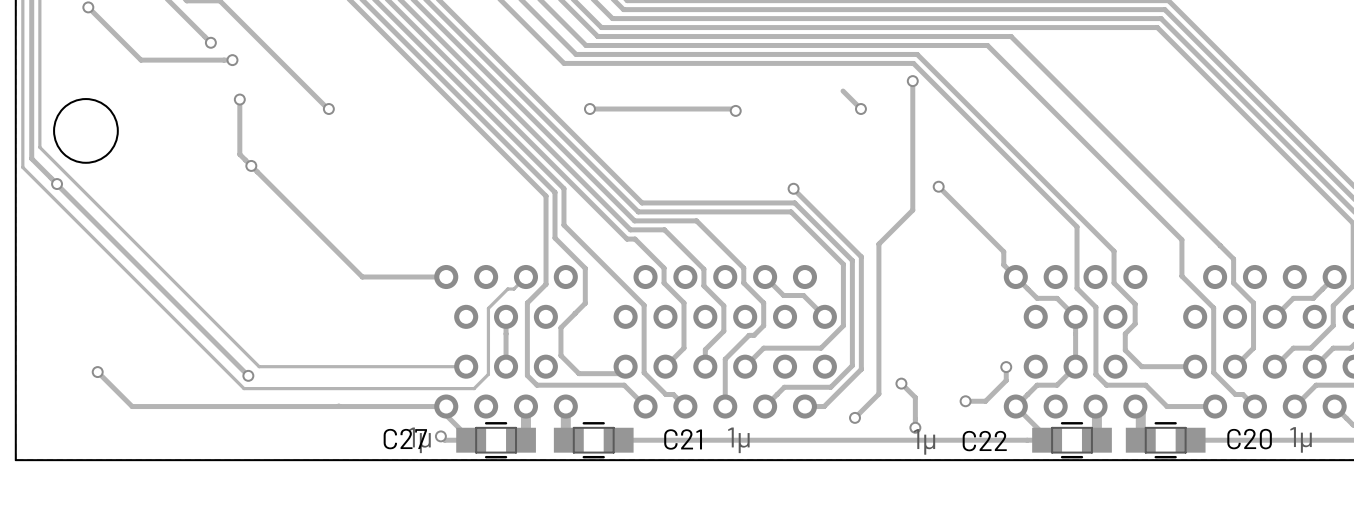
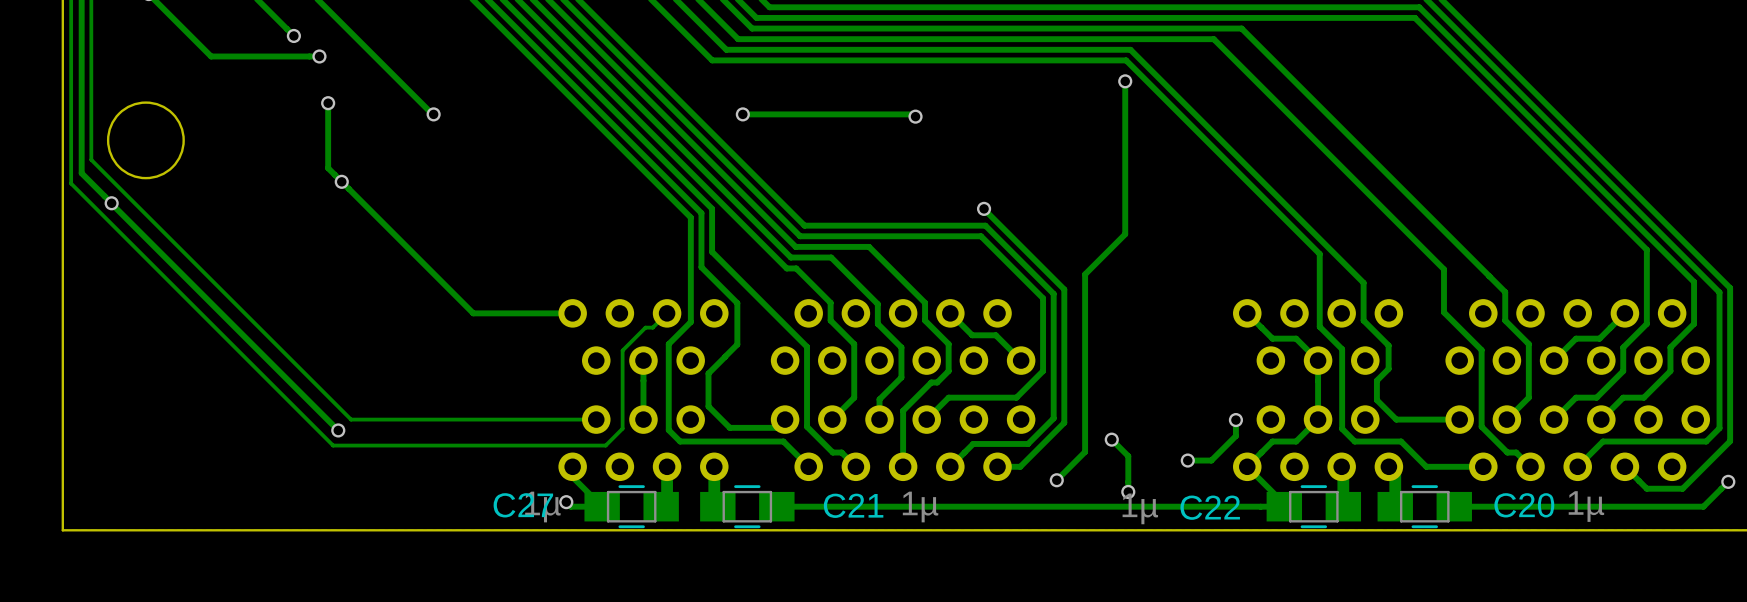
track: (843, 91) (860, 109) -> none
via: (860, 109) -> none
track: (938, 186) (1003, 251) (1003, 264) (1015, 277) -> none
via: (938, 186) -> none
track: (97, 372) (132, 406) (446, 406) -> none
via: (97, 372) -> none

